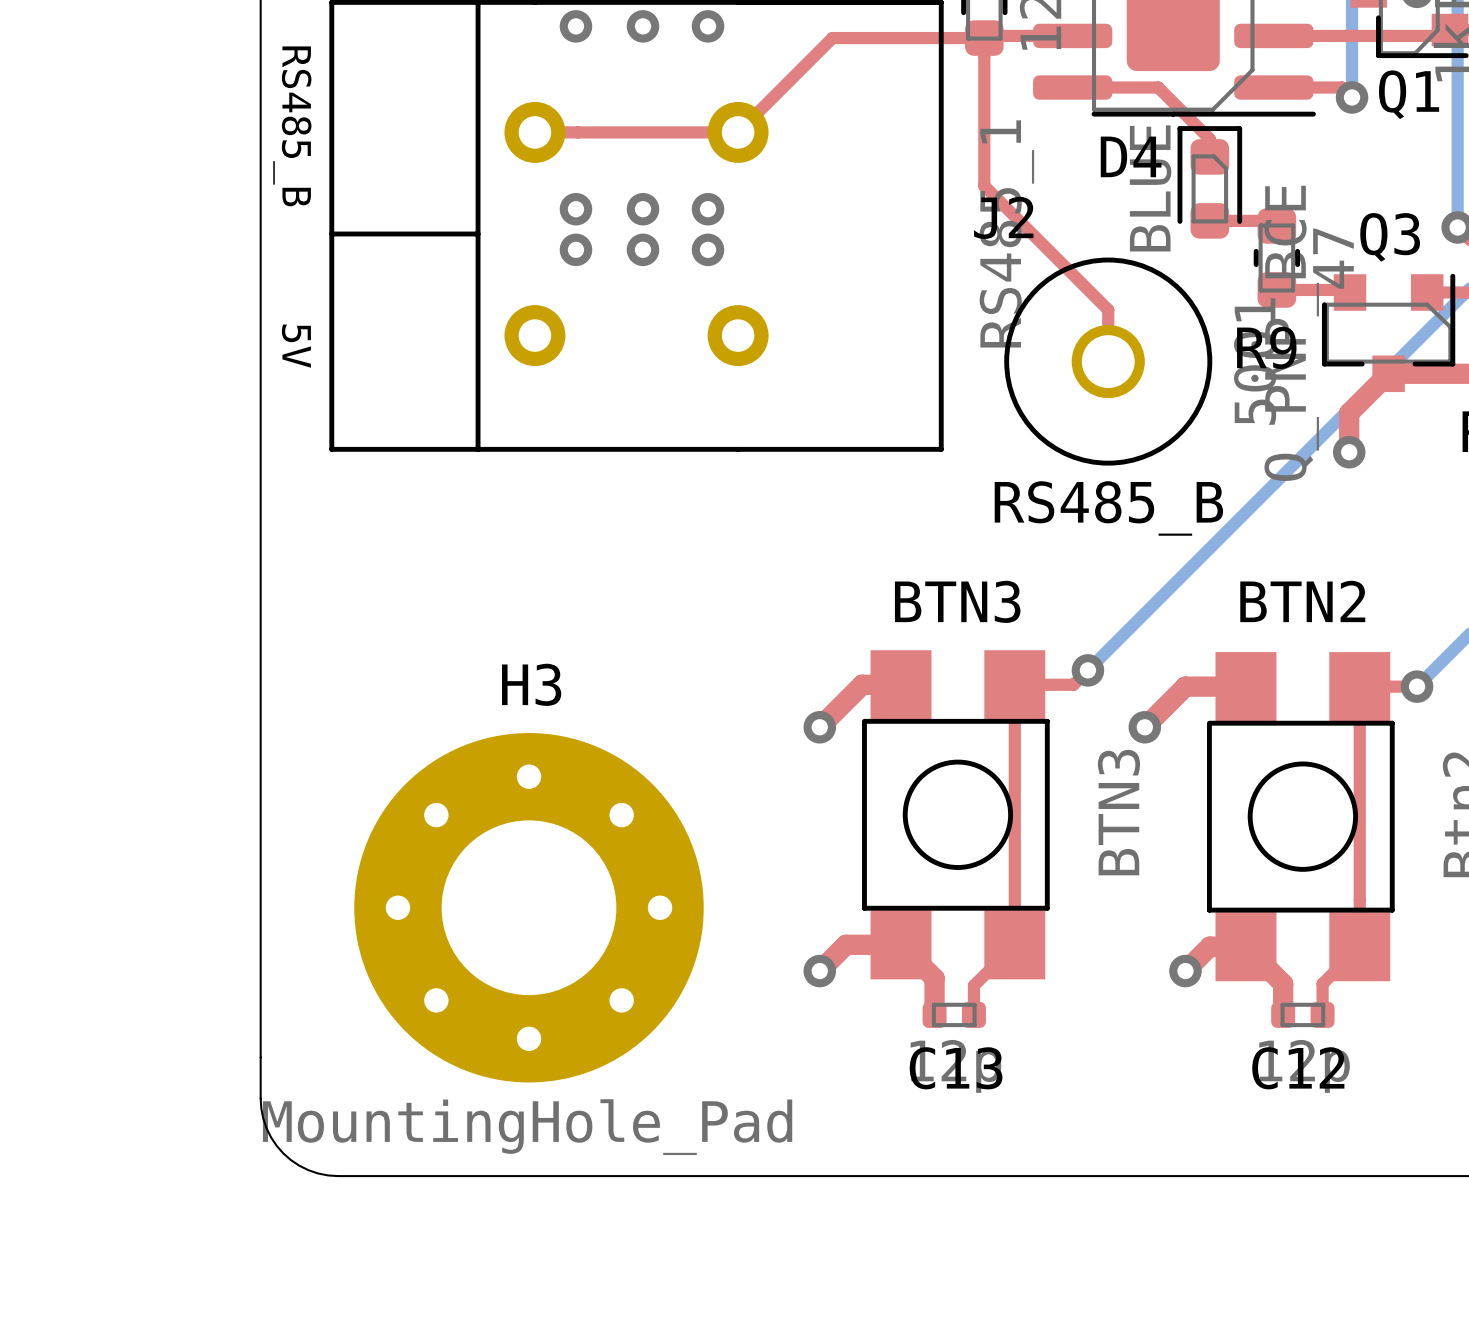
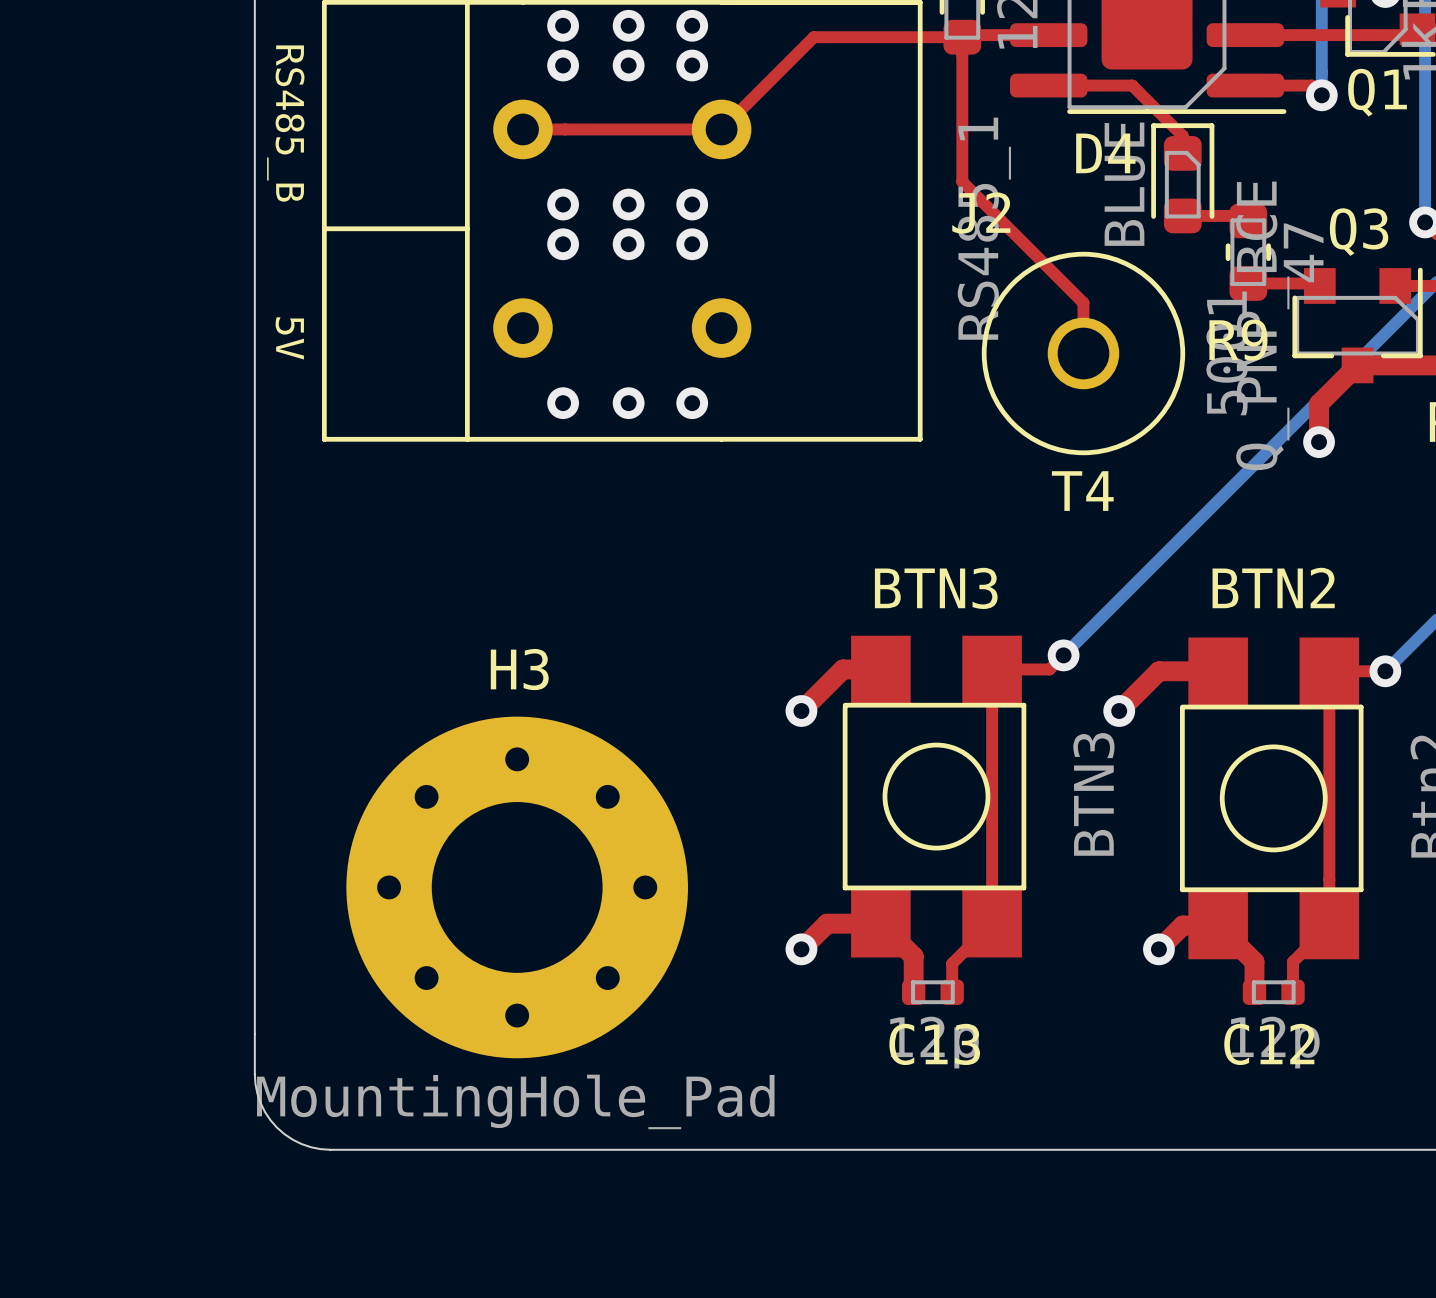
via: none -> (563, 65)
via: none -> (628, 65)
via: none -> (692, 65)
via: none -> (563, 403)
via: none -> (628, 403)
via: none -> (692, 403)
RS485_B name: RS485_B (1108, 508) -> T4 (1082, 491)

